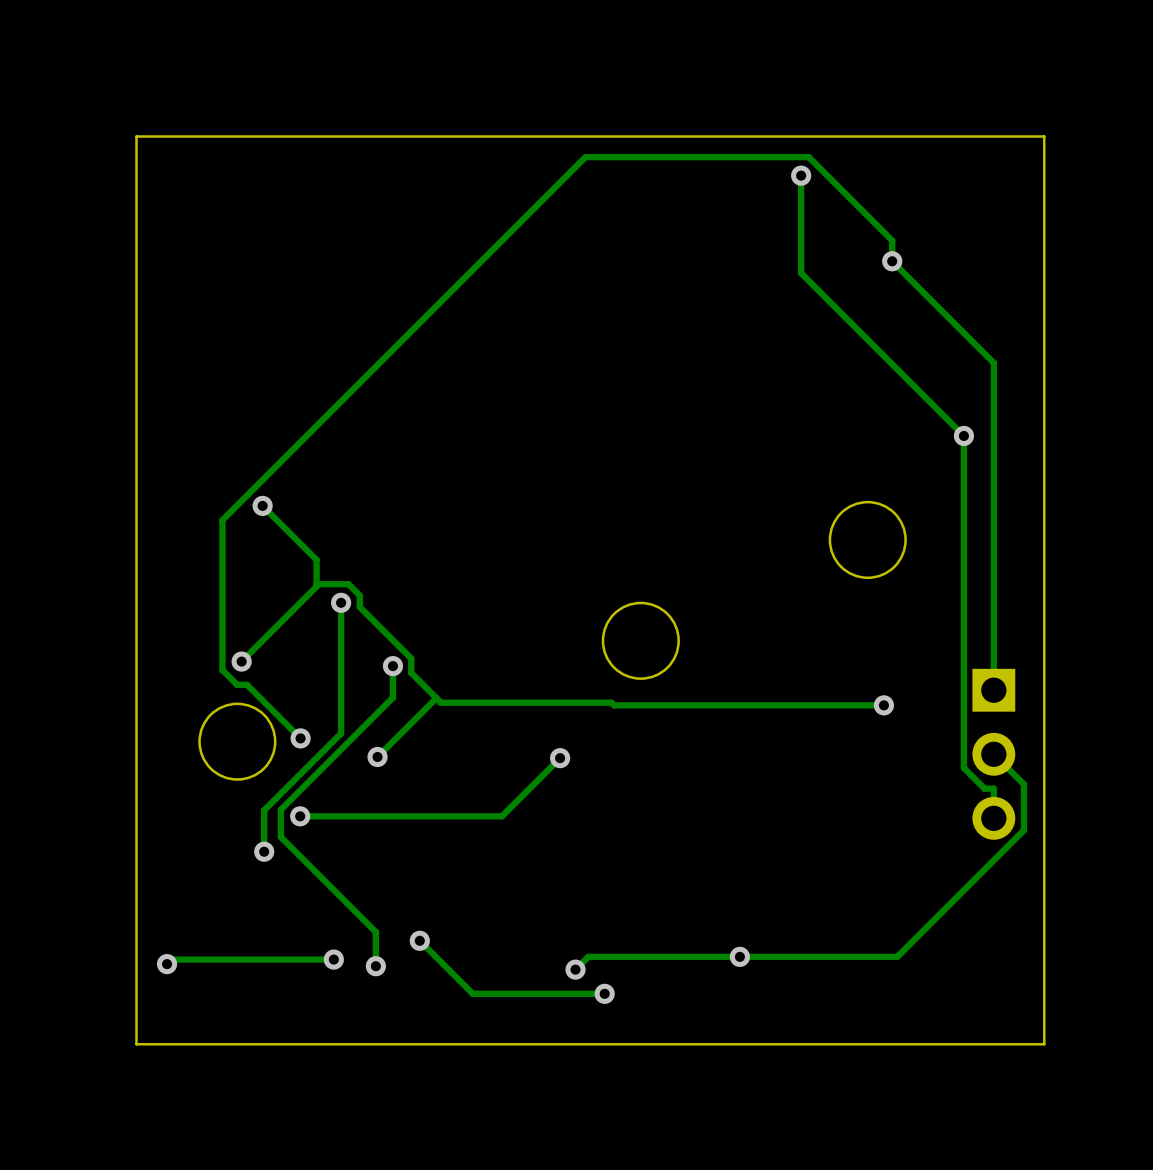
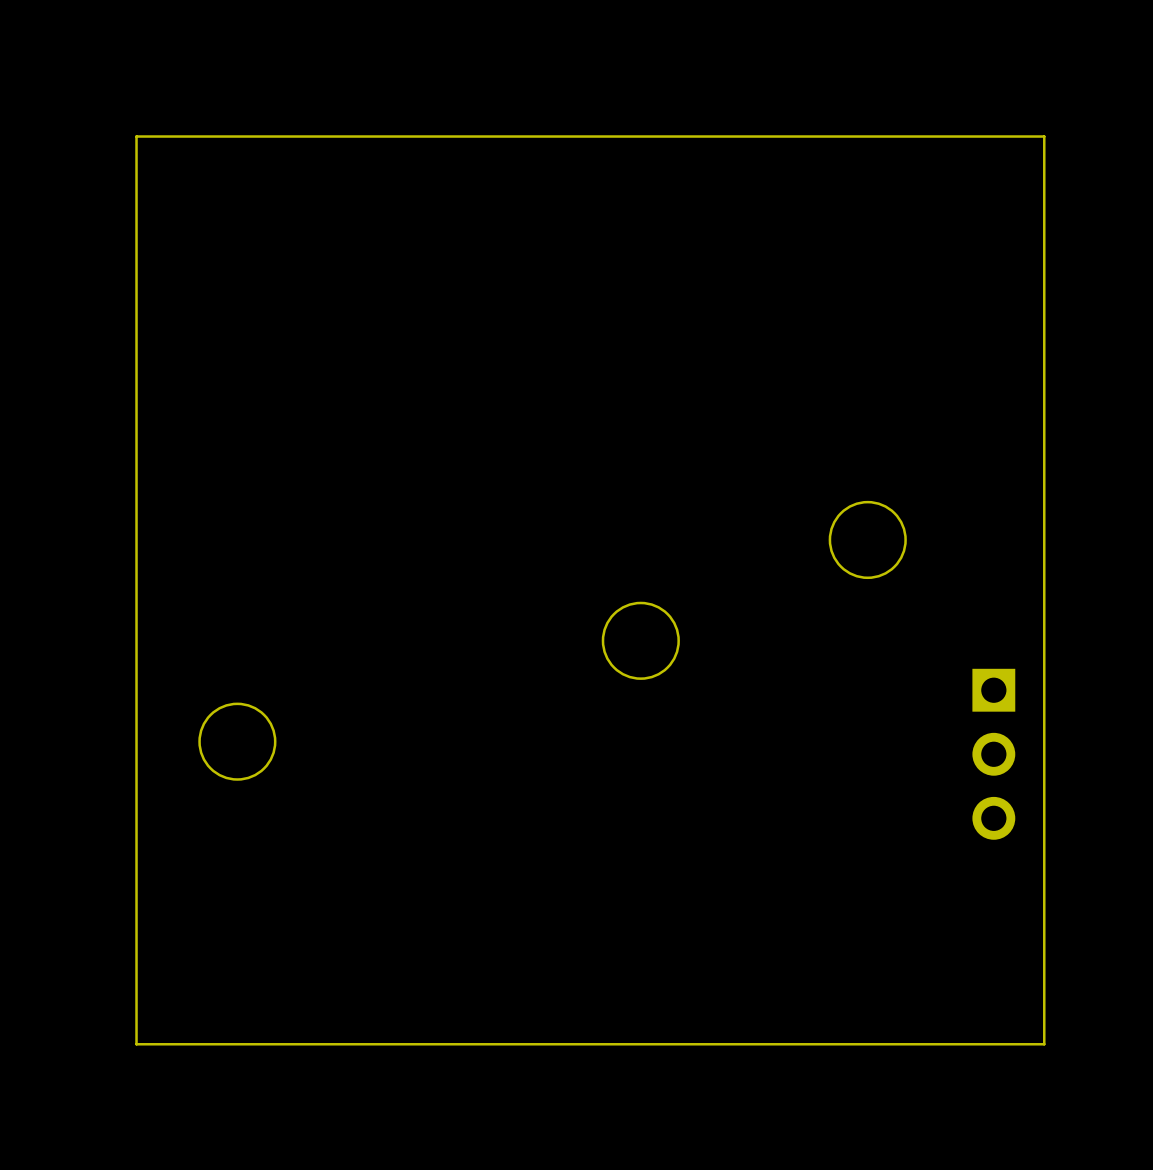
track: (801, 175) (801, 273) (963, 435) (963, 768) (984, 788) (993, 788) (993, 818) -> none
via: (801, 175) -> none
via: (892, 261) -> none
via: (963, 435) -> none
track: (262, 505) (316, 559) (316, 586) (241, 661) -> none
via: (262, 505) -> none
track: (316, 584) (348, 584) (359, 595) (359, 607) (411, 658) (411, 672) (441, 702) (611, 702) (614, 705) (883, 705) -> none
track: (341, 602) (341, 733) (264, 810) (264, 851) -> none
via: (341, 602) -> none
via: (241, 661) -> none
track: (392, 666) (392, 697) (280, 809) (280, 837) (375, 932) (375, 966) -> none
via: (392, 666) -> none
track: (993, 690) (993, 362) (892, 261) (892, 240) (808, 157) (585, 157) (222, 520) (222, 670) (237, 684) (247, 684) (300, 738) -> none
track: (436, 698) (377, 756) -> none
via: (883, 705) -> none
via: (300, 738) -> none
track: (993, 754) (1023, 784) (1023, 830) (897, 956) (588, 956) (575, 969) -> none
via: (377, 756) -> none
track: (560, 758) (501, 816) (300, 816) -> none
via: (560, 758) -> none
via: (300, 816) -> none
via: (264, 851) -> none
track: (419, 940) (472, 993) (604, 993) -> none
via: (419, 940) -> none
via: (739, 956) -> none
track: (333, 959) (171, 959) (167, 964) -> none
via: (333, 959) -> none
via: (167, 964) -> none
via: (375, 966) -> none
via: (575, 969) -> none
via: (604, 993) -> none

